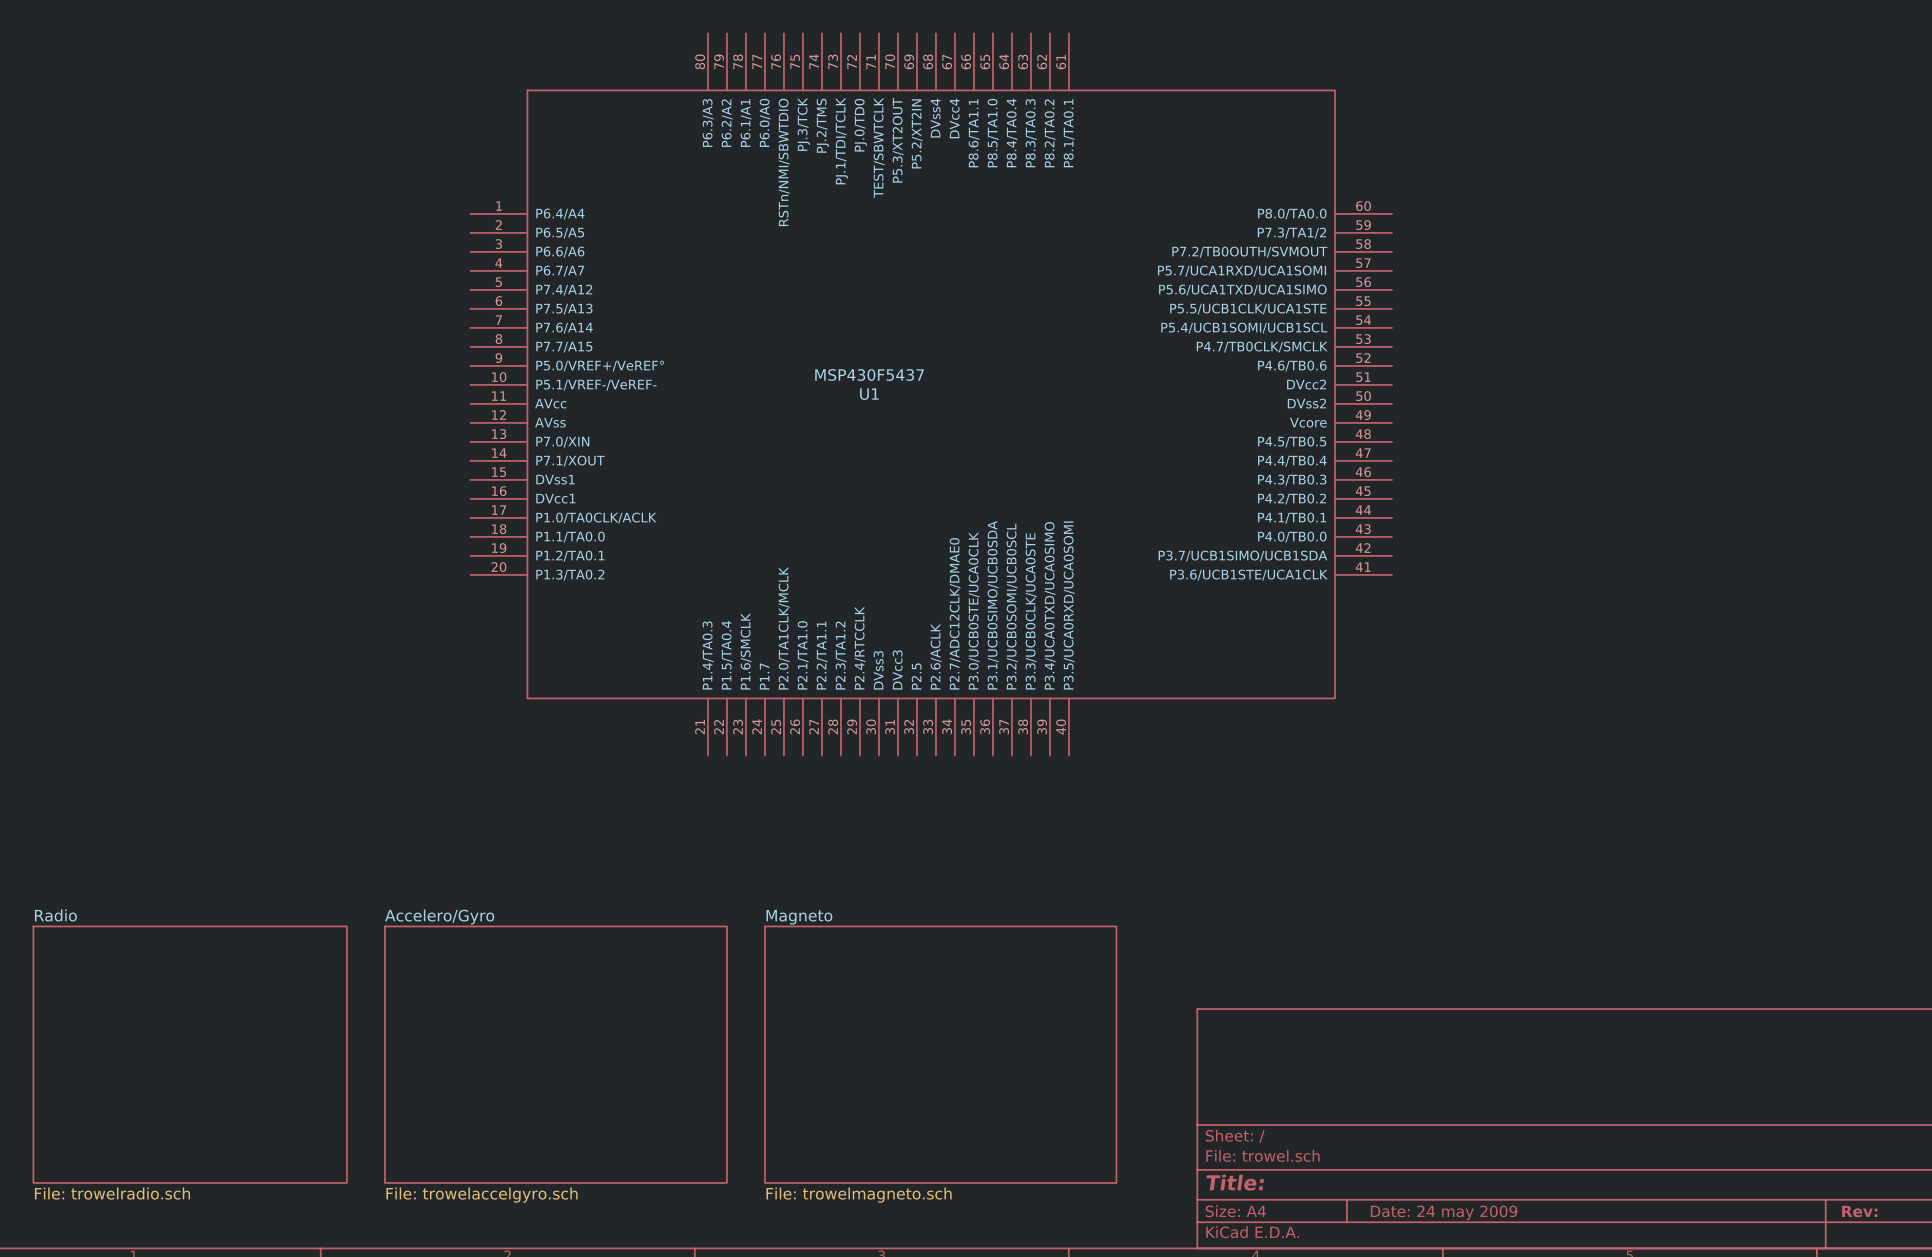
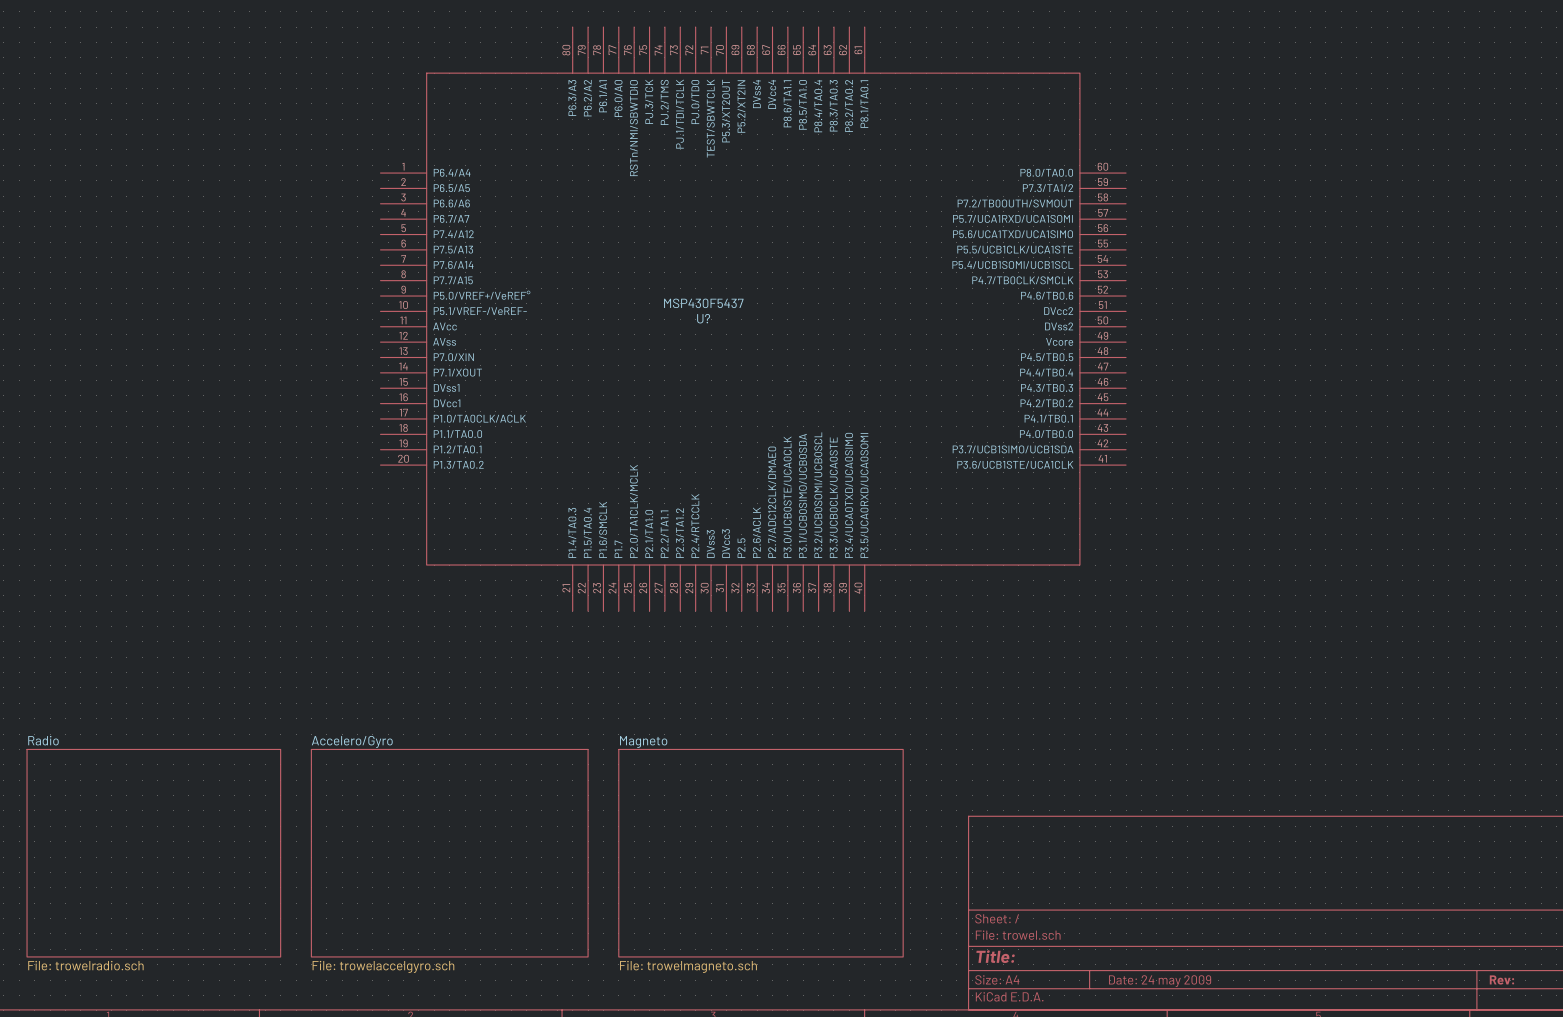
U1 name: U1 (869, 394) -> U? (703, 318)

